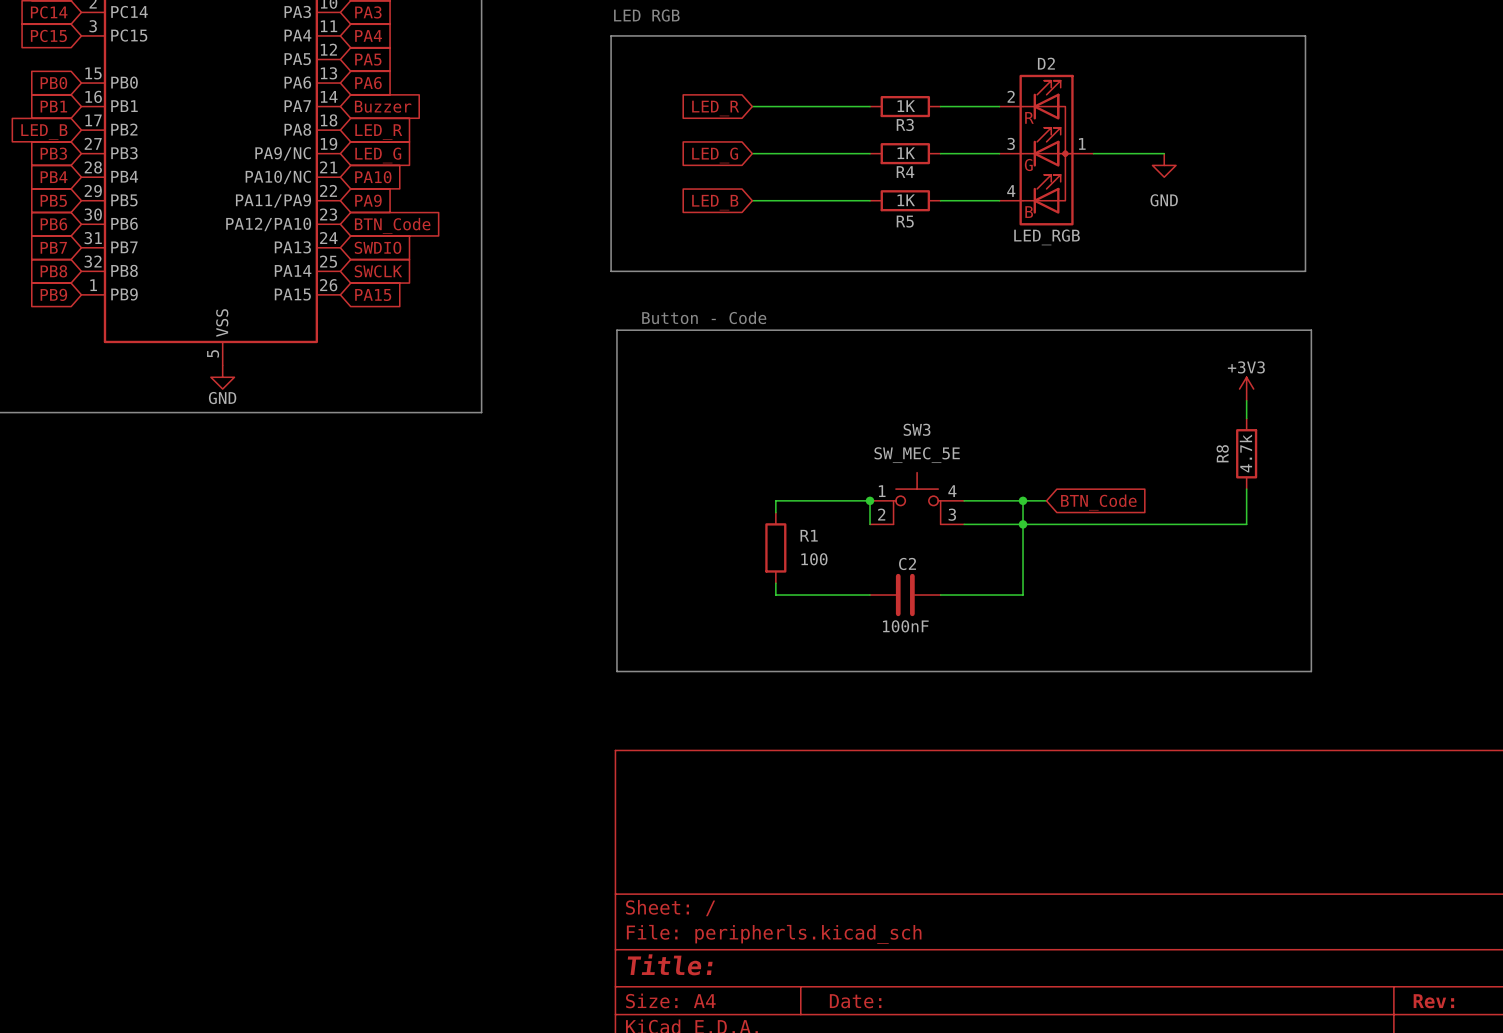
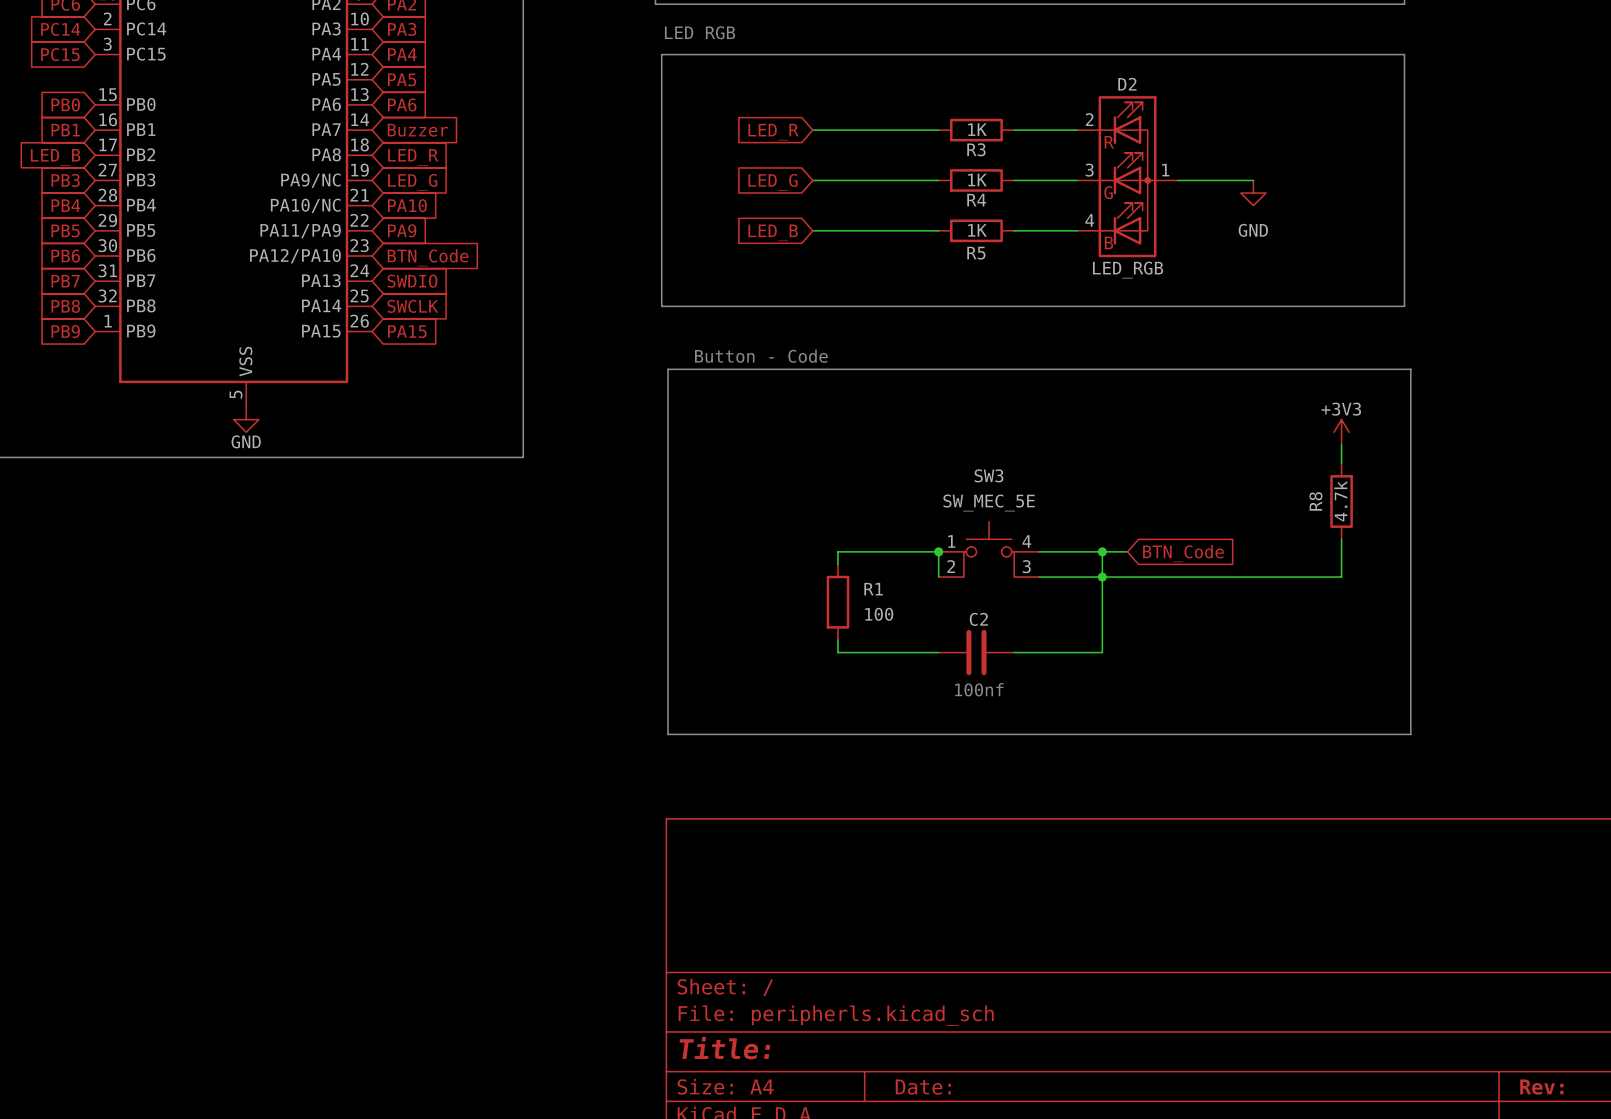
C2 value: 100nF (905, 626) -> none
text: none -> 100nf (979, 689)

